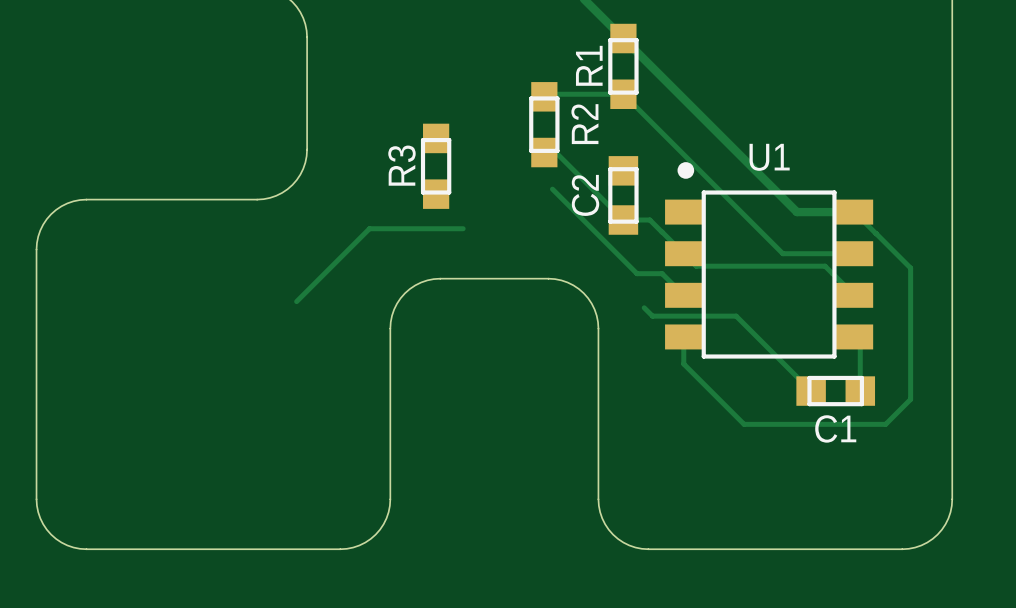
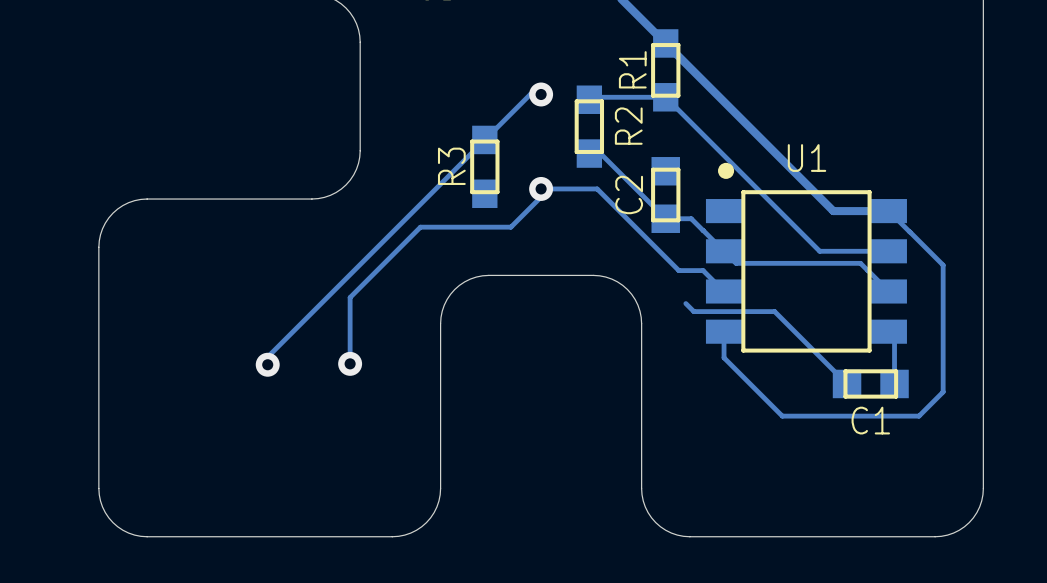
track: none -> (541, 94) (530, 94) (267, 357) (267, 364)
via: none -> (541, 94)
via: none -> (541, 188)
track: none -> (597, 188) (541, 188) (541, 196) (510, 227)
track: none -> (350, 297) (350, 363)
via: none -> (350, 363)
via: none -> (267, 364)

